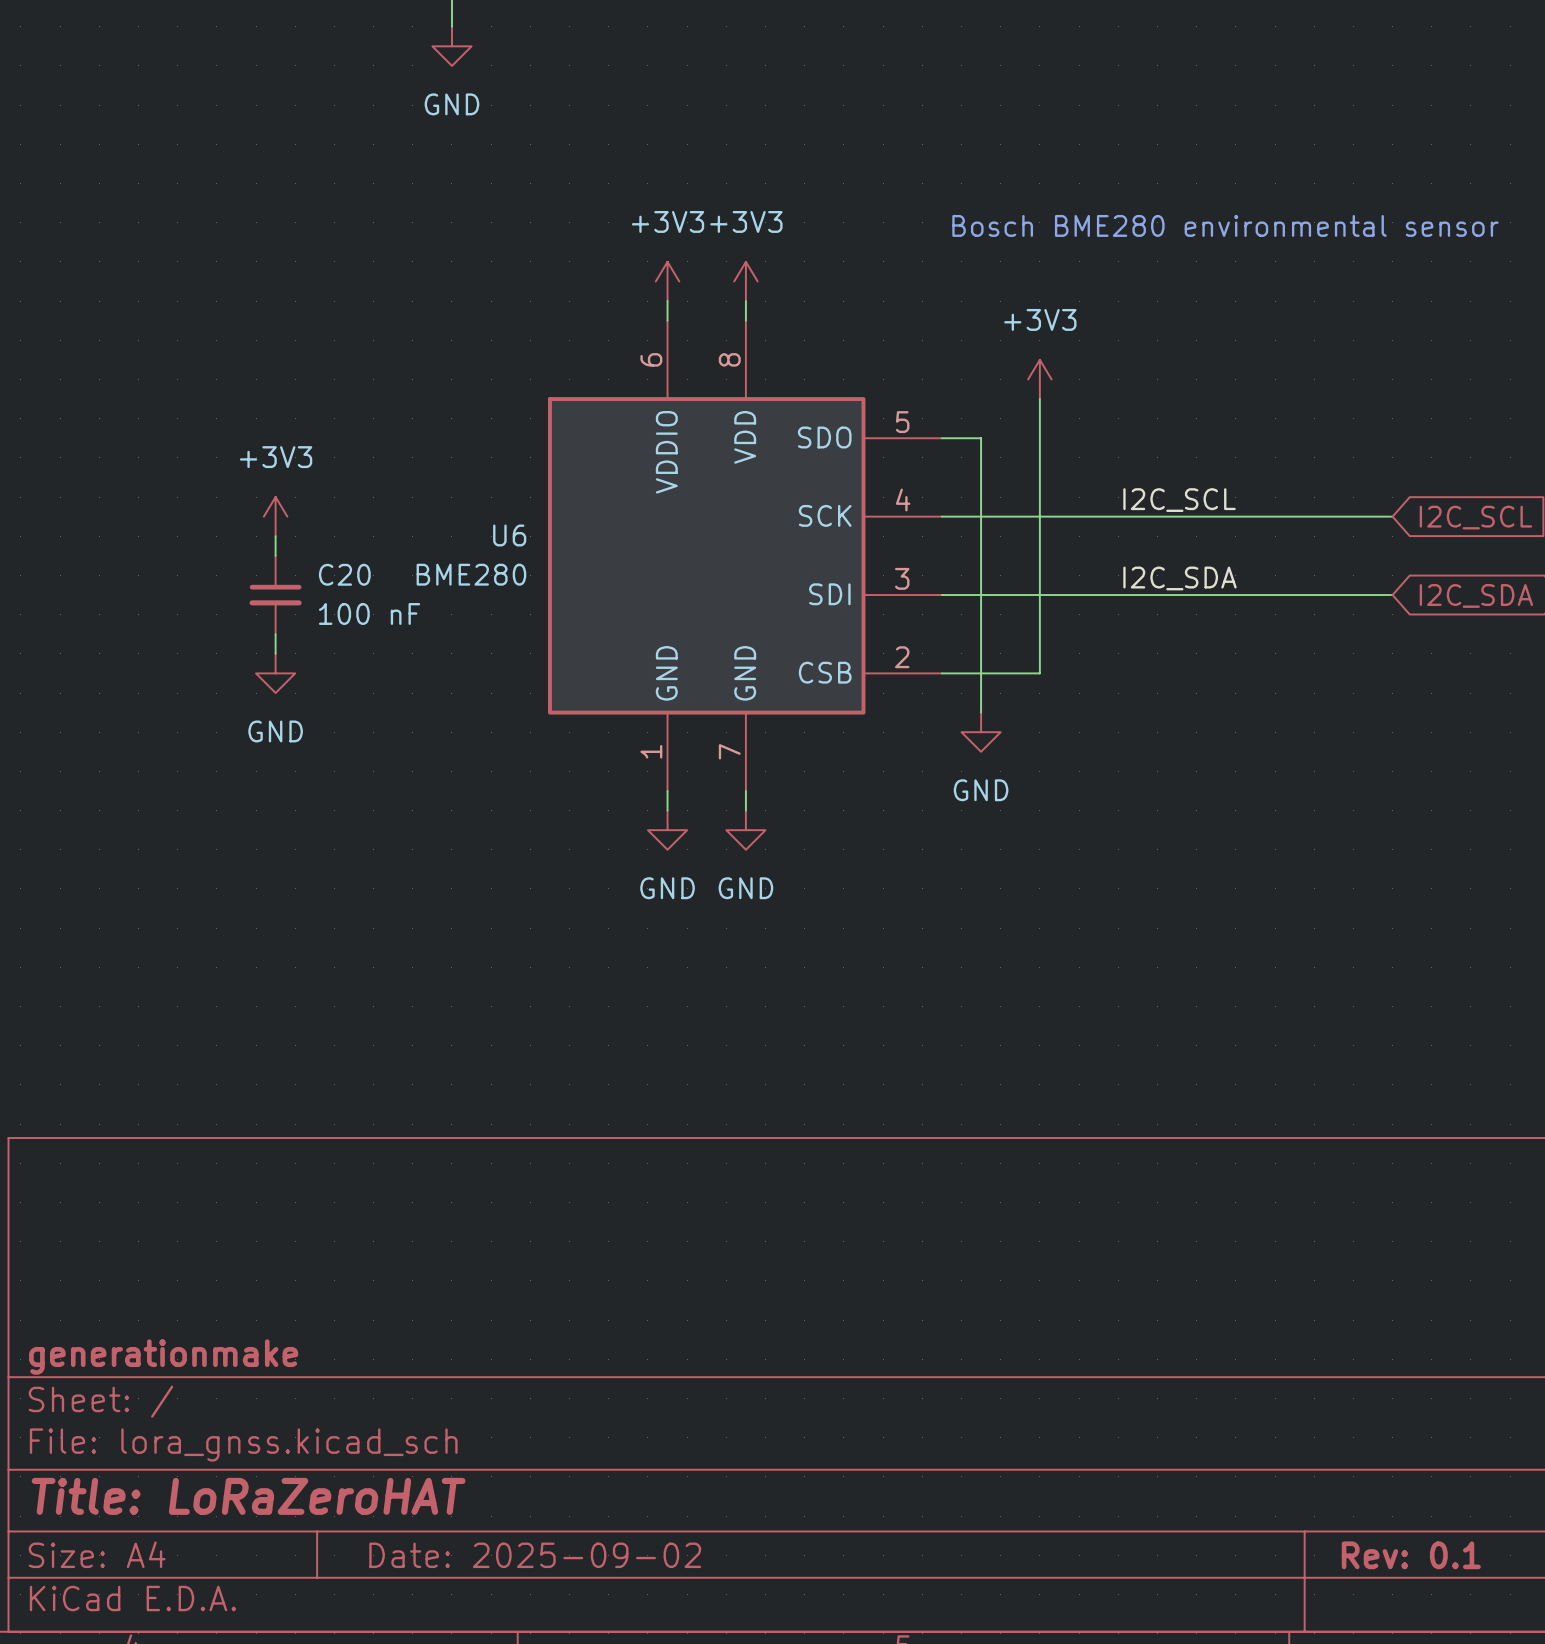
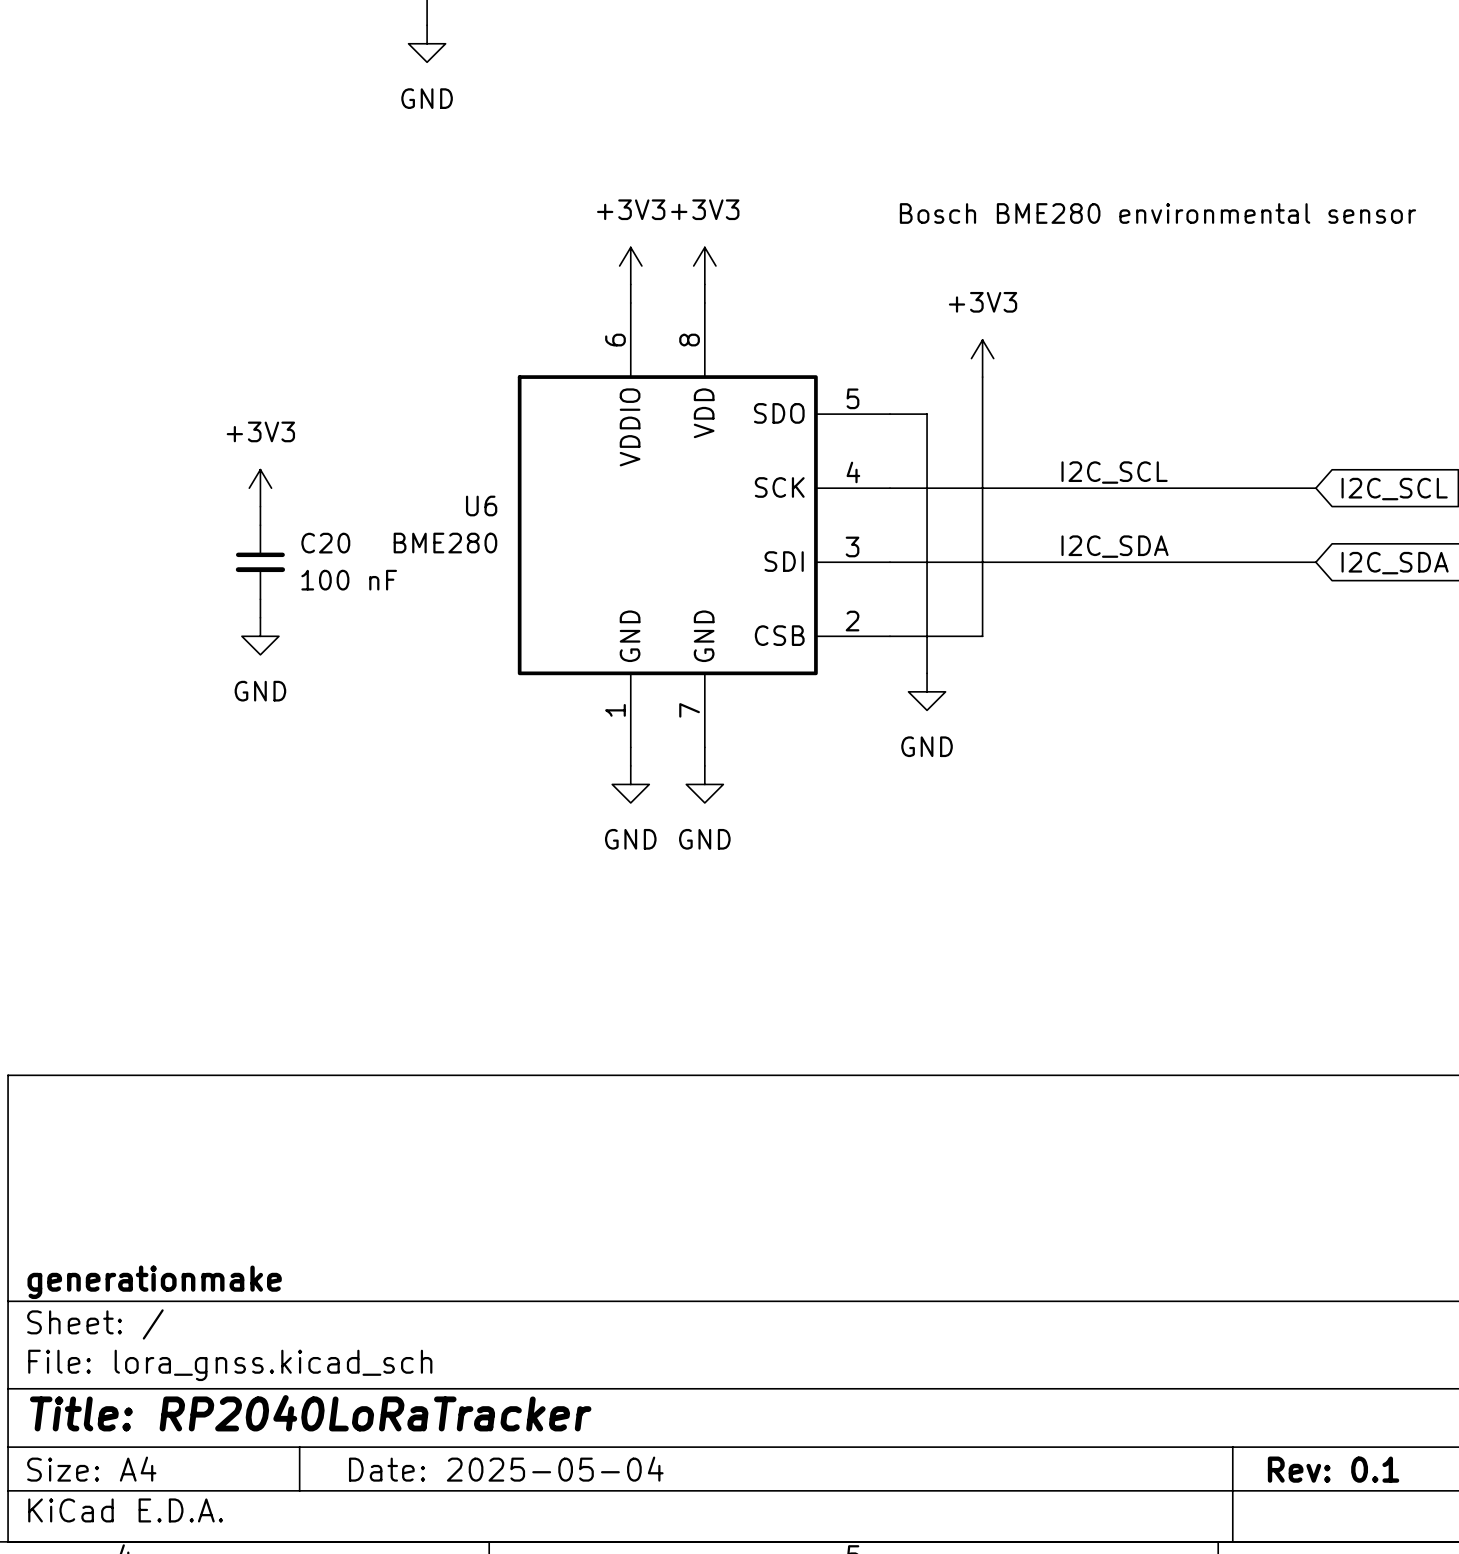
title block: Title: LoRaZeroHAT (248, 1496) -> Title: RP2040LoRaTracker (310, 1413)
title block: Date: 2025-09-02 (535, 1555) -> Date: 2025-05-04 (506, 1469)

